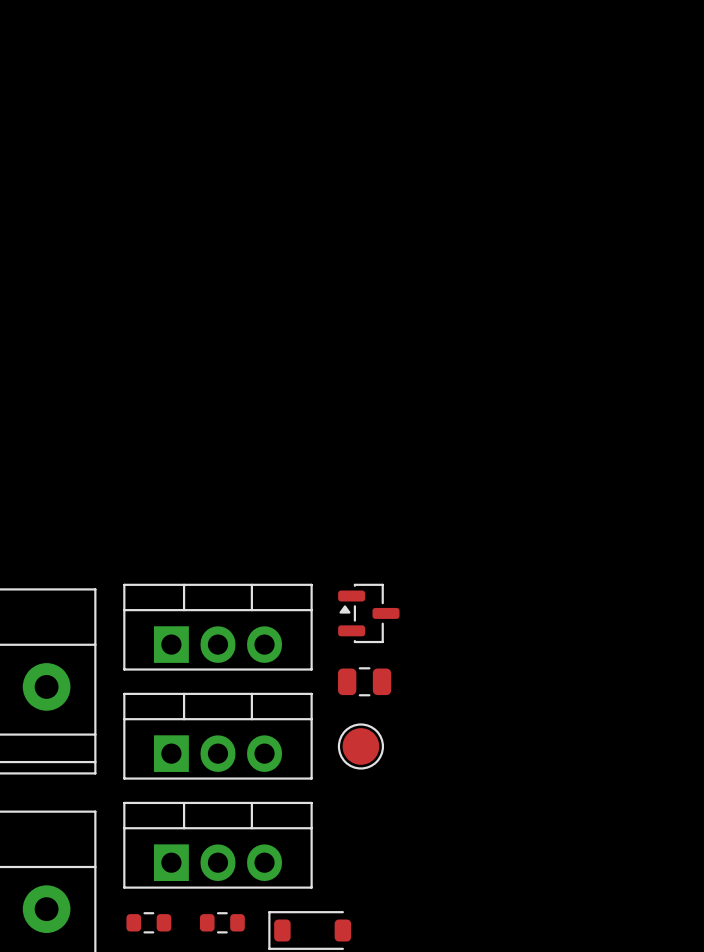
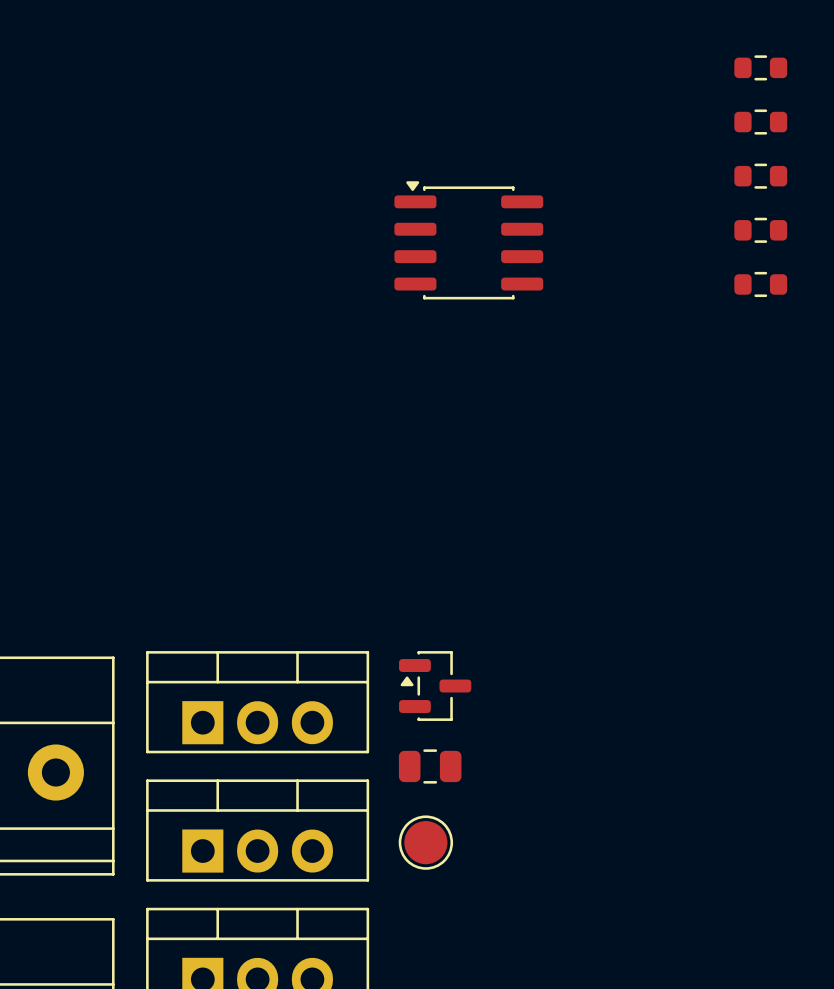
part: none -> (760, 67)
part: none -> (760, 122)
part: none -> (760, 176)
part: none -> (760, 230)
part: none -> (468, 240)
part: none -> (760, 284)

